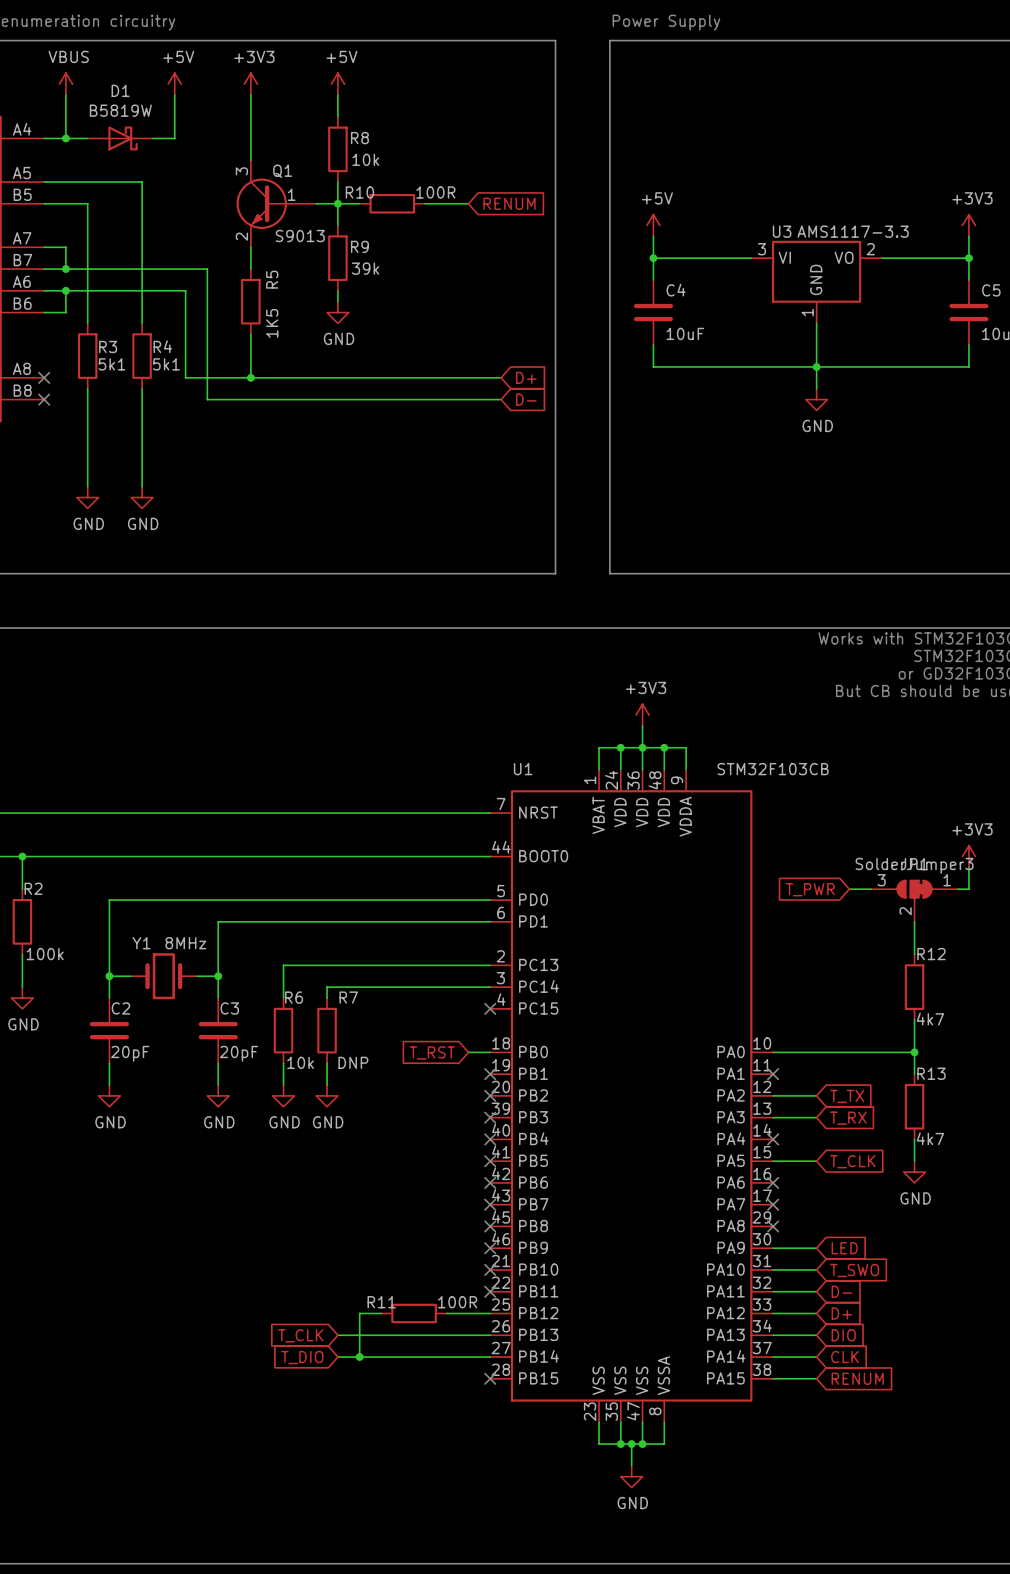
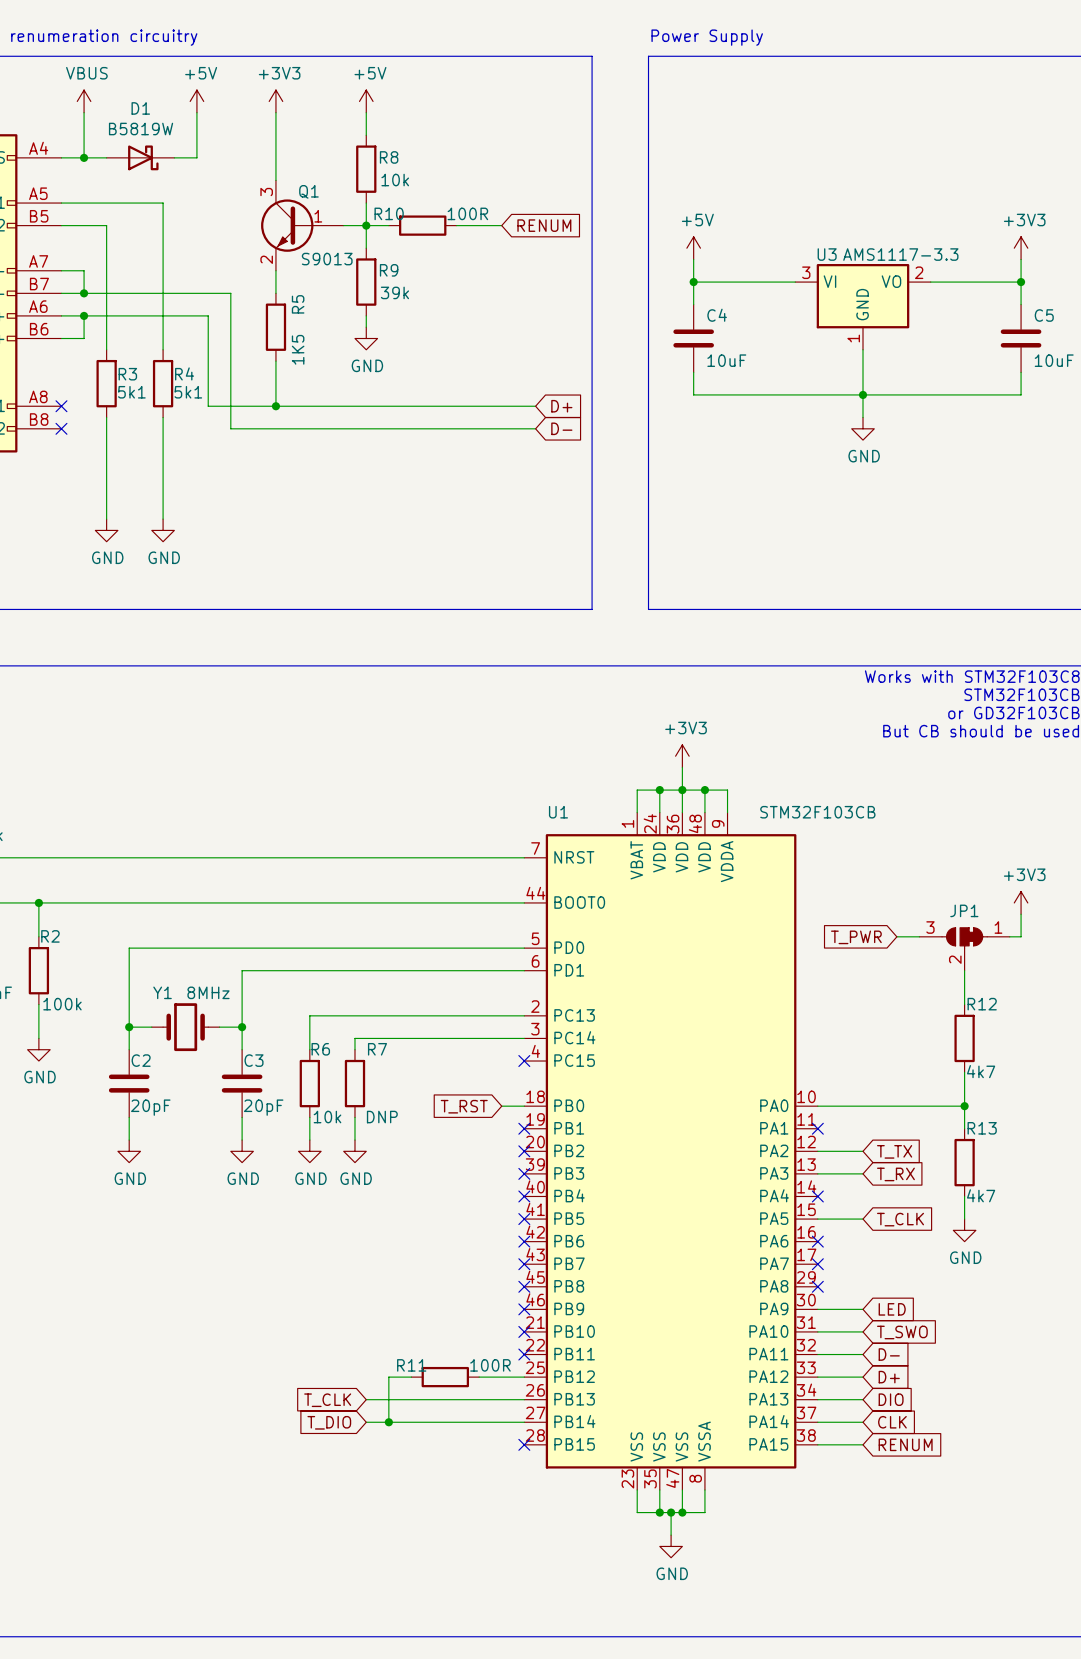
JP1 value: SolderJumper3 (914, 865) -> none

